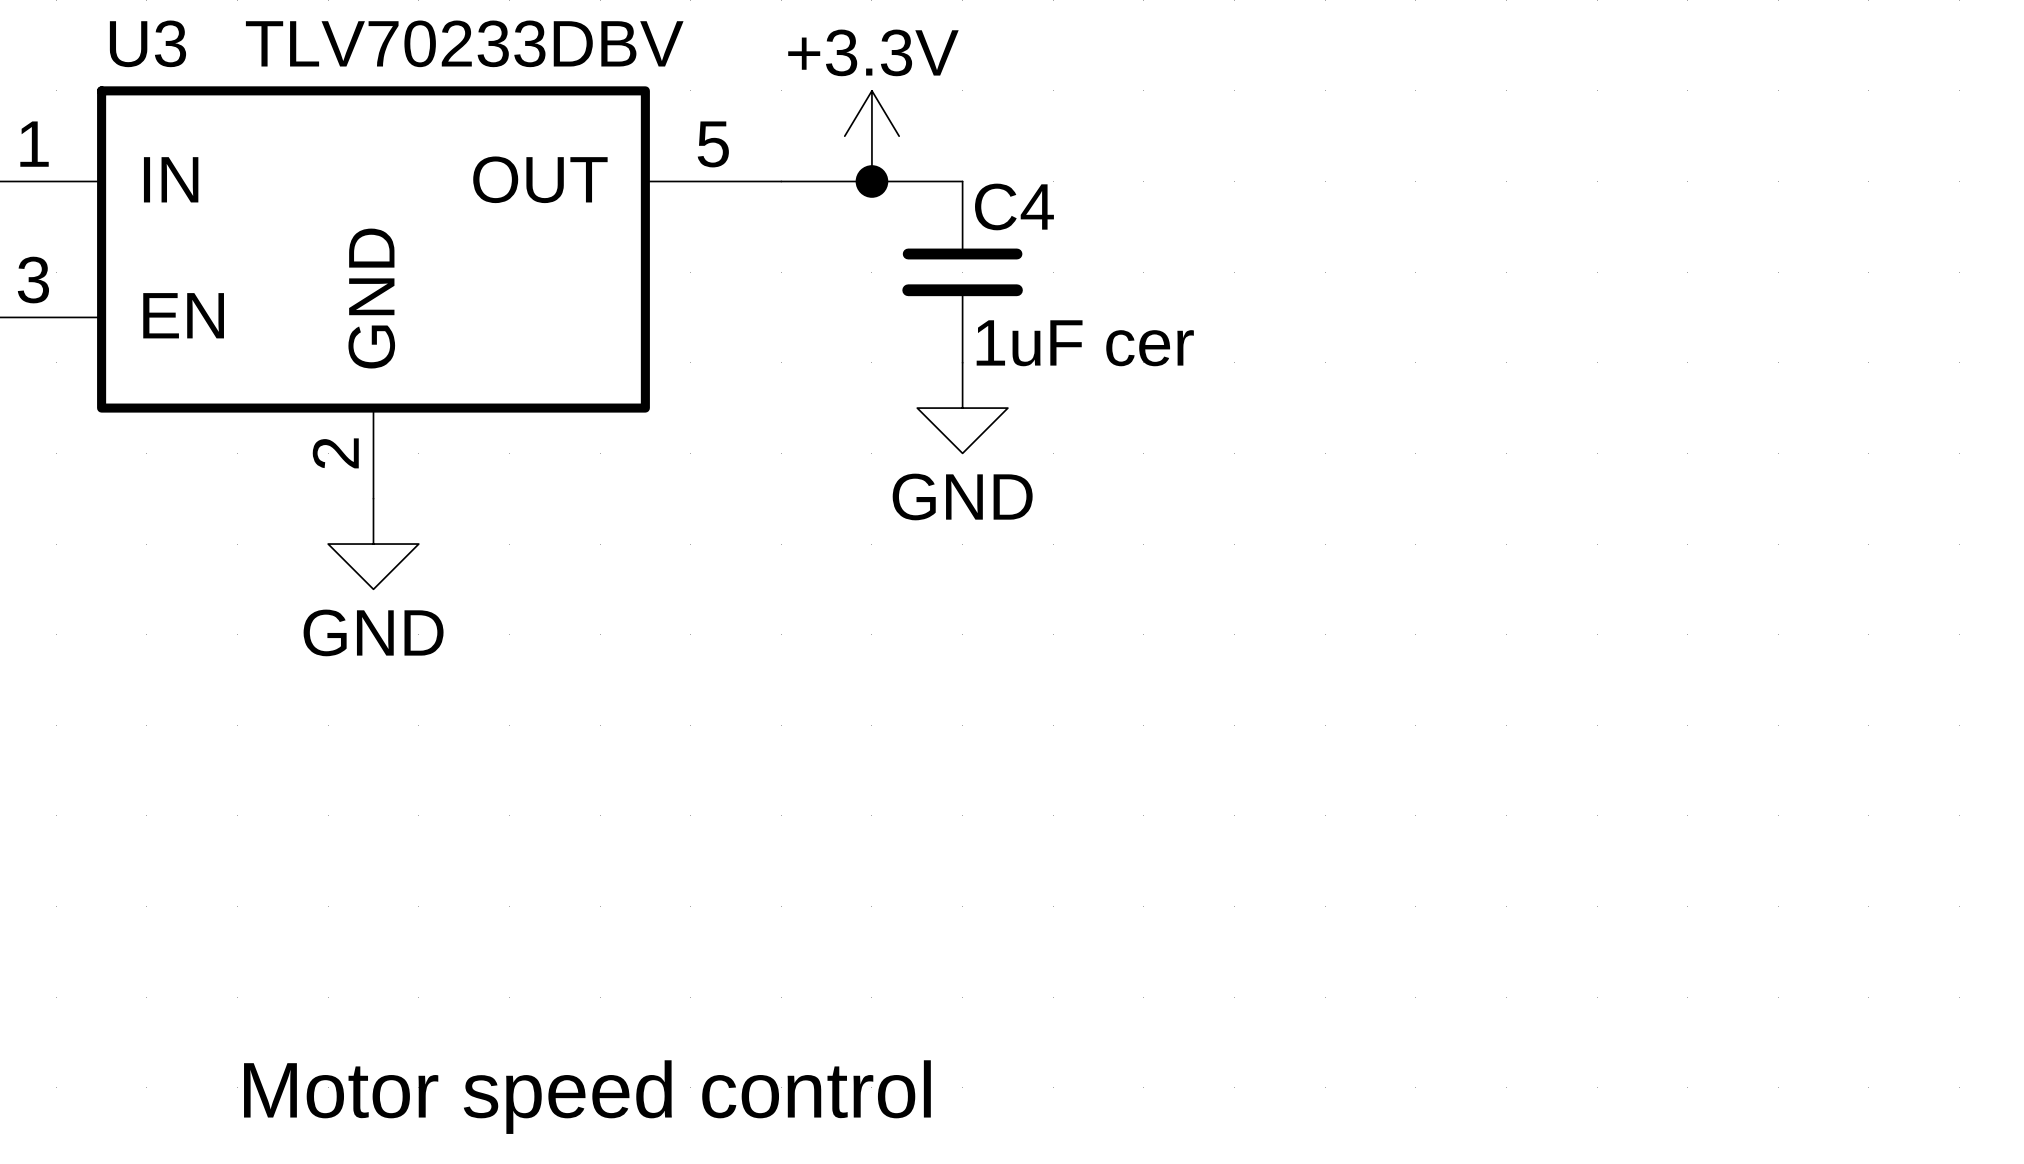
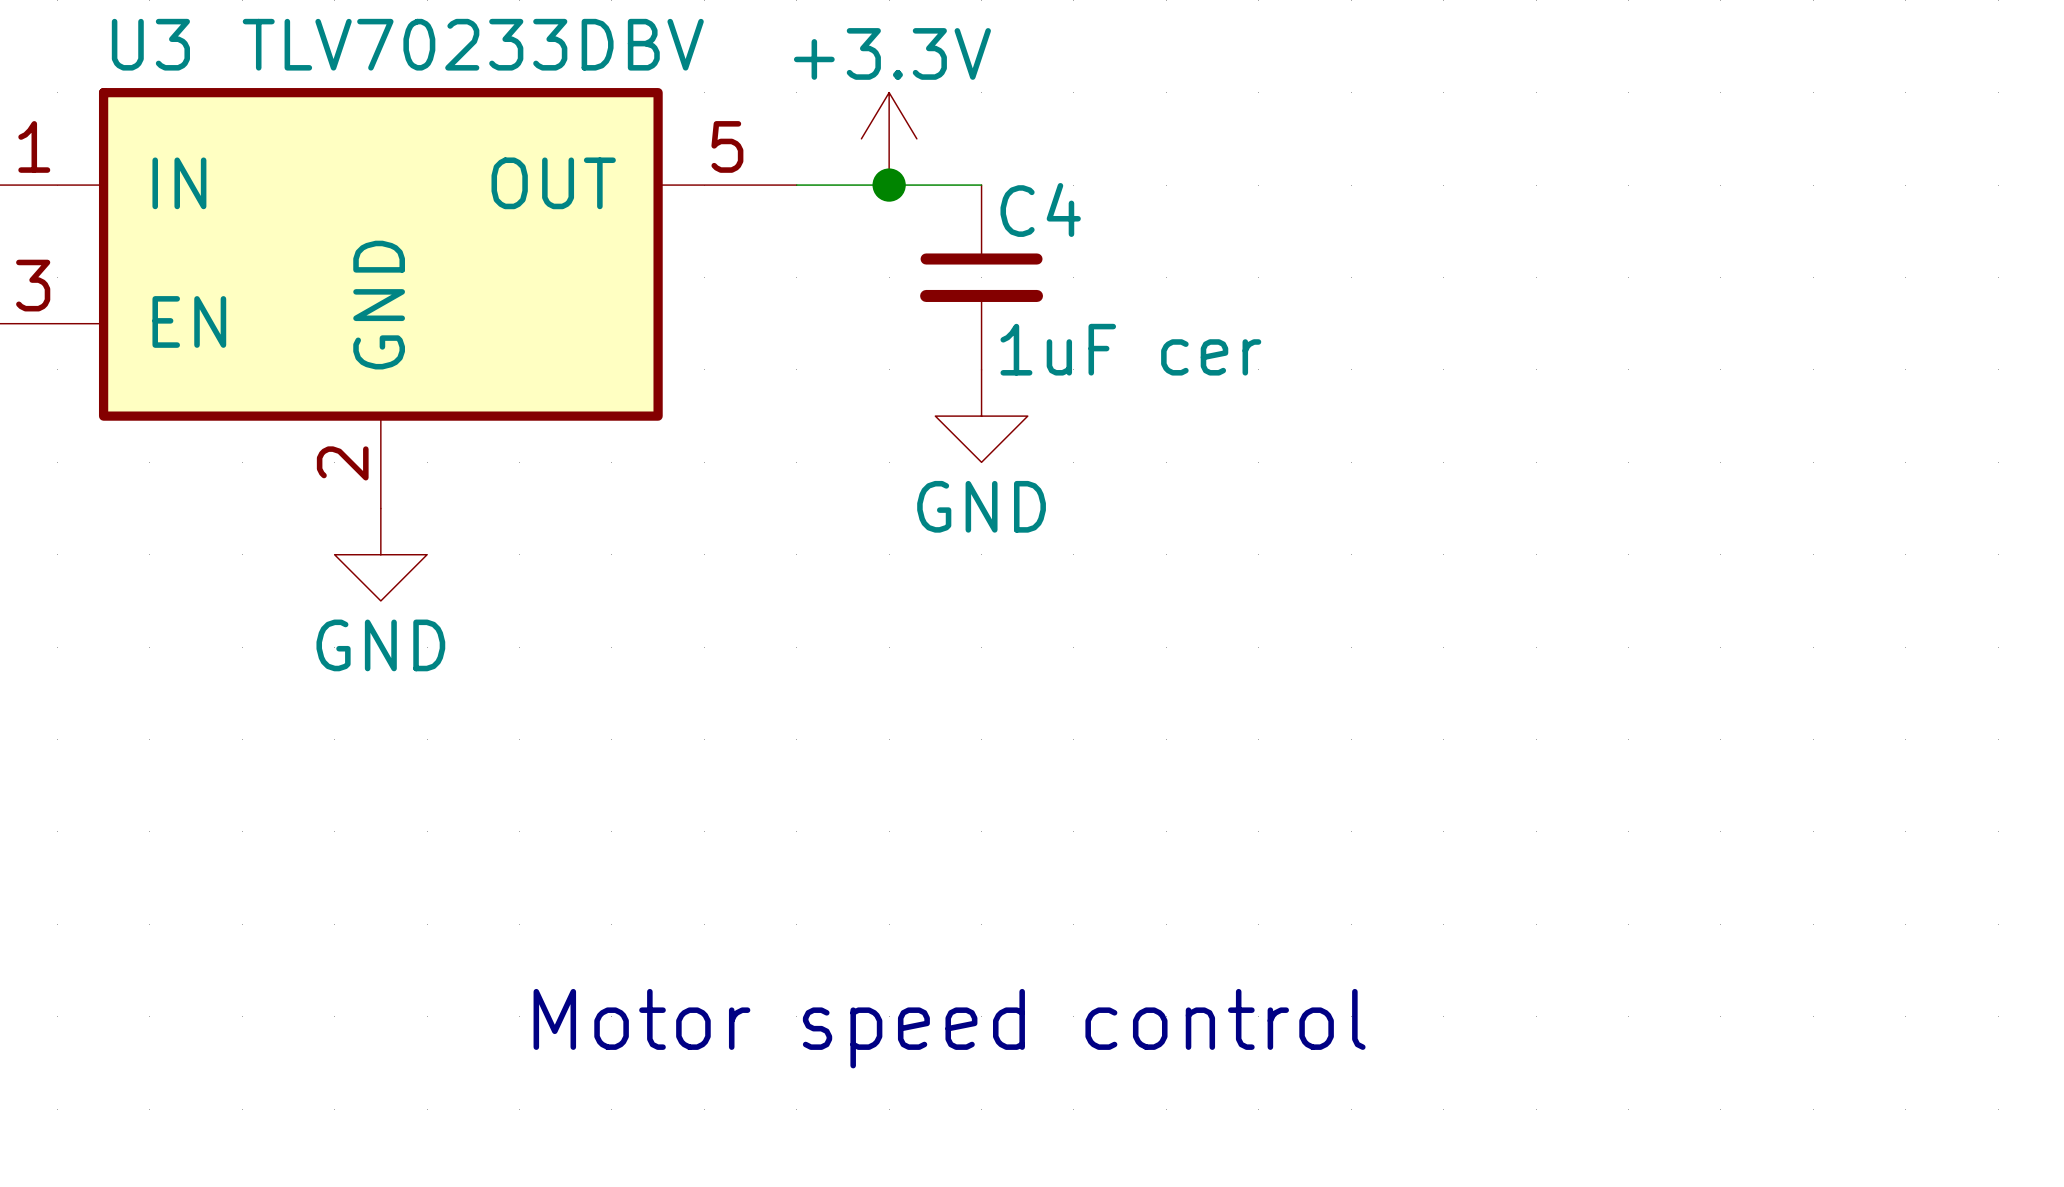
text position: Motor speed control (587, 1097) -> Motor speed control (949, 1028)

